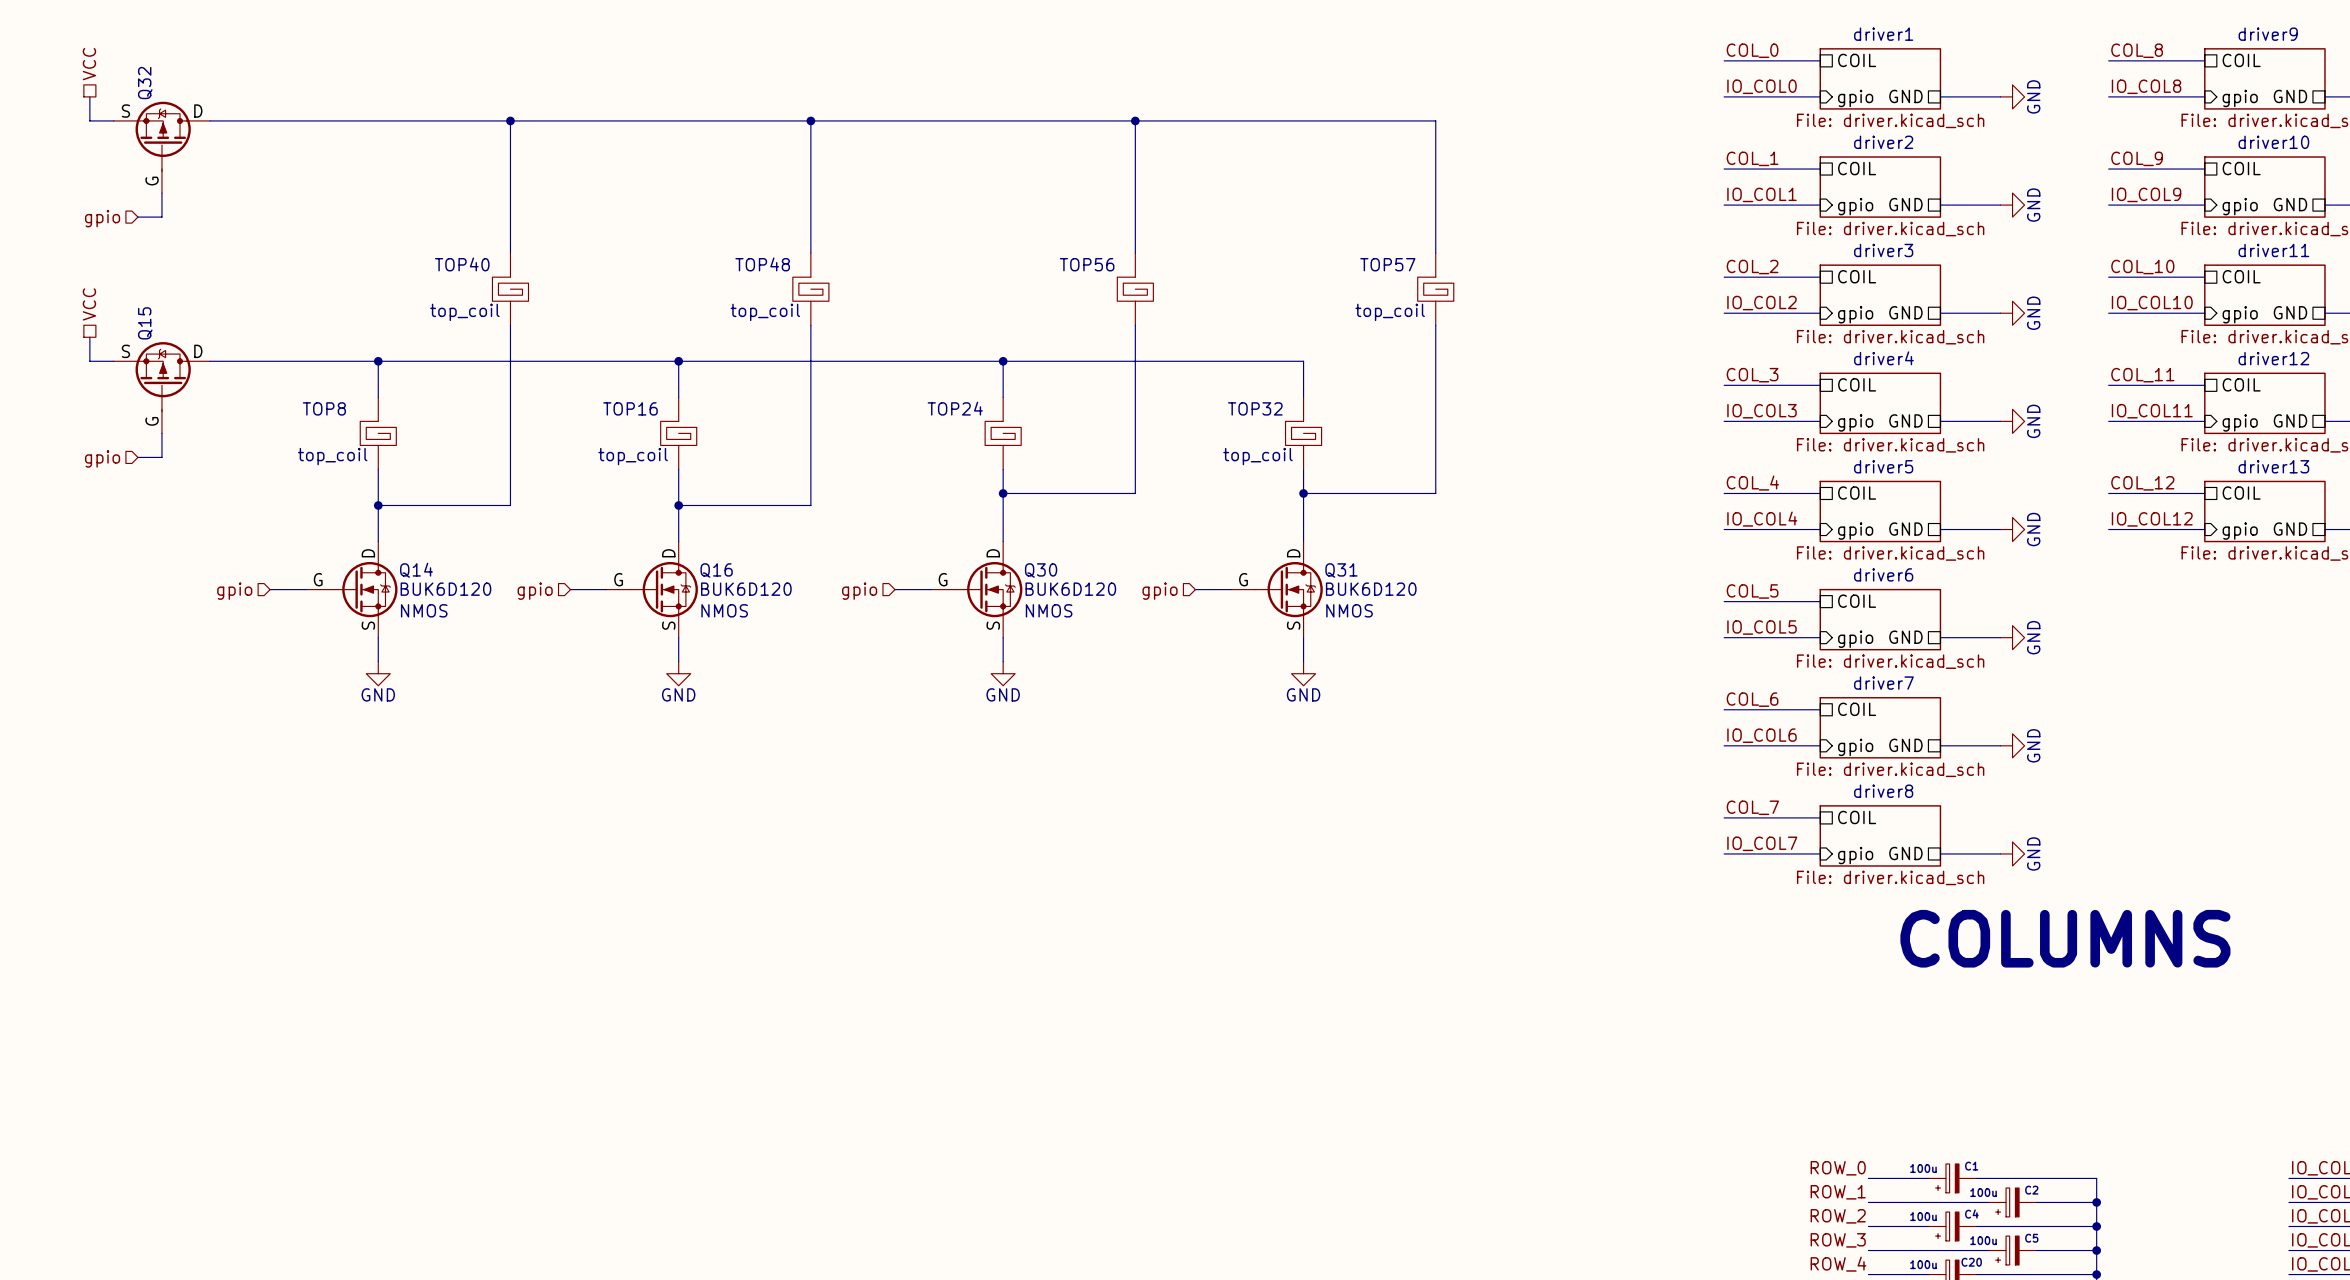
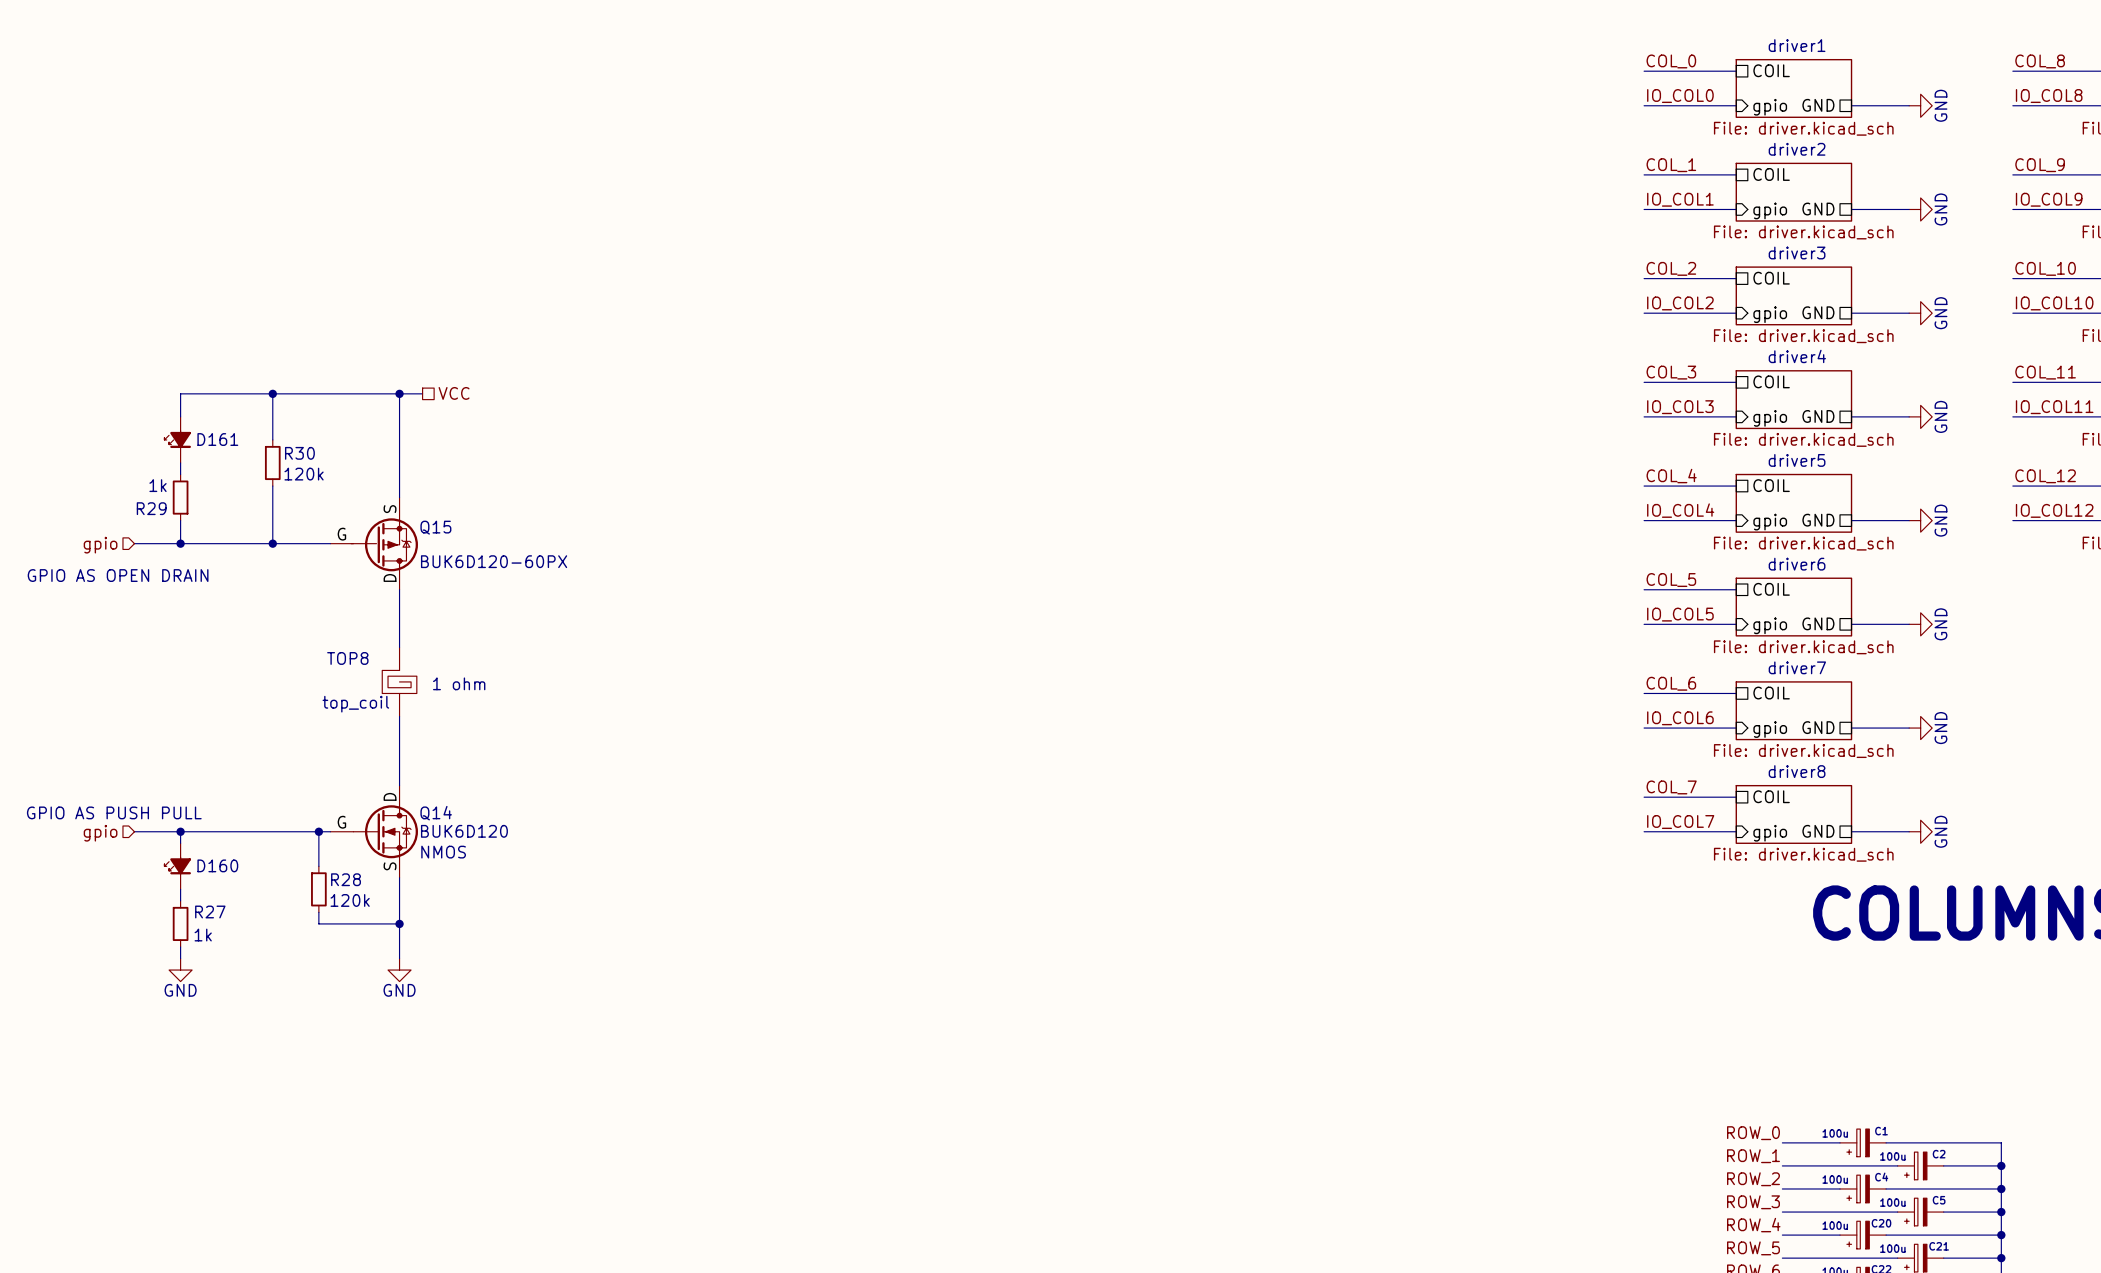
hierarchical label: VCC (89, 64) -> none
wire: (89, 96) (89, 120) (113, 120) -> none
wire: (210, 120) (1435, 120) (1435, 253) -> none
wire: (510, 120) (510, 253) -> none
junction: (510, 120) -> none
wire: (810, 120) (810, 253) -> none
junction: (810, 120) -> none
wire: (1135, 120) (1135, 253) -> none
junction: (1135, 120) -> none
Q32: (161, 147) -> none
wire: (161, 193) (161, 217) (137, 217) -> none
hierarchical label: gpio (102, 218) -> none
TOP40: top_coil (510, 289) -> none
TOP48: top_coil (810, 289) -> none
TOP56: (1135, 289) -> none
TOP57: top_coil (1435, 289) -> none
hierarchical label: VCC (89, 304) -> none
wire: (510, 325) (510, 505) (378, 505) -> none
wire: (810, 325) (810, 505) (678, 505) -> none
wire: (1135, 325) (1135, 493) (1003, 493) -> none
wire: (1435, 325) (1435, 493) (1303, 493) -> none
wire: (89, 337) (89, 361) (113, 361) -> none
wire: (210, 361) (1303, 361) (1303, 397) -> none
wire: (378, 361) (378, 397) -> none
junction: (378, 361) -> none
wire: (678, 361) (678, 397) -> none
junction: (678, 361) -> none
wire: (1003, 361) (1003, 397) -> none
junction: (1003, 361) -> none
Q15 rotation: 0° (163, 376) -> 90° clockwise (384, 544)
Q15 position: (161, 387) -> (374, 543)
hierarchical label: none -> VCC (454, 393)
wire: none -> (272, 393) (272, 439)
junction: none -> (272, 393)
wire: none -> (399, 393) (399, 497)
junction: none -> (399, 393)
wire: none -> (422, 393) (180, 393) (180, 416)
wire: (161, 433) (161, 457) (137, 457) -> none
TOP8 position: (378, 433) -> (399, 681)
TOP16: top_coil (678, 433) -> none
TOP24: (1003, 433) -> none
TOP32: top_coil (1303, 433) -> none
D161: none -> (177, 439)
hierarchical label: gpio (102, 458) -> none
wire: none -> (180, 463) (180, 474)
R30: none -> 120k (272, 463)
wire: (378, 469) (378, 541) -> none
wire: (678, 469) (678, 541) -> none
wire: (1003, 469) (1003, 541) -> none
wire: (1303, 469) (1303, 541) -> none
wire: none -> (272, 486) (272, 543)
junction: (1003, 493) -> none
junction: (1303, 493) -> none
R29: none -> 1k (180, 497)
junction: (378, 505) -> none
junction: (678, 505) -> none
wire: none -> (134, 543) (330, 543)
junction: none -> (180, 543)
junction: none -> (272, 543)
hierarchical label: none -> gpio (100, 545)
Q15 value: none -> BUK6D120-60PX (494, 561)
text: none -> GPIO AS OPEN DRAIN (118, 575)
wire: (270, 589) (306, 589) -> none
Q14 position: (351, 589) -> (374, 831)
wire: (570, 589) (606, 589) -> none
Q16: BUK6D120 (652, 589) -> none
wire: (895, 589) (931, 589) -> none
Q30: BUK6D120 (976, 589) -> none
wire: (1195, 589) (1231, 589) -> none
Q31: BUK6D120 (1277, 589) -> none
hierarchical label: gpio (234, 591) -> none
hierarchical label: gpio (535, 591) -> none
hierarchical label: gpio (859, 591) -> none
hierarchical label: gpio (1160, 591) -> none
wire: none -> (399, 589) (399, 647)
text: NMOS (424, 610) -> none
text: NMOS (724, 610) -> none
text: NMOS (1049, 610) -> none
text: NMOS (1349, 610) -> none
wire: (378, 637) (378, 661) -> (180, 520) (180, 543)
wire: (678, 637) (678, 661) -> none
wire: (1003, 637) (1003, 661) -> none
wire: (1303, 637) (1303, 661) -> none
power symbol: GND (378, 673) -> none
power symbol: GND (678, 673) -> none
power symbol: GND (1003, 673) -> none
power symbol: GND (1303, 673) -> none
text: none -> 1 ohm (459, 683)
wire: none -> (399, 716) (399, 785)
text: none -> GPIO AS PUSH PULL (114, 812)
wire: none -> (134, 831) (330, 831)
wire: none -> (180, 831) (180, 843)
junction: none -> (180, 831)
wire: none -> (318, 831) (318, 866)
junction: none -> (318, 831)
hierarchical label: none -> gpio (100, 833)
text: none -> NMOS (443, 852)
D160: none -> (177, 866)
wire: none -> (399, 877) (399, 958)
wire: none -> (180, 889) (180, 900)
R28: none -> 120k (318, 889)
wire: none -> (318, 912) (318, 923) (399, 923)
R27: none -> 1k (180, 923)
junction: none -> (399, 923)
wire: none -> (180, 946) (180, 958)
power symbol: none -> GND (180, 970)
power symbol: none -> GND (399, 970)

